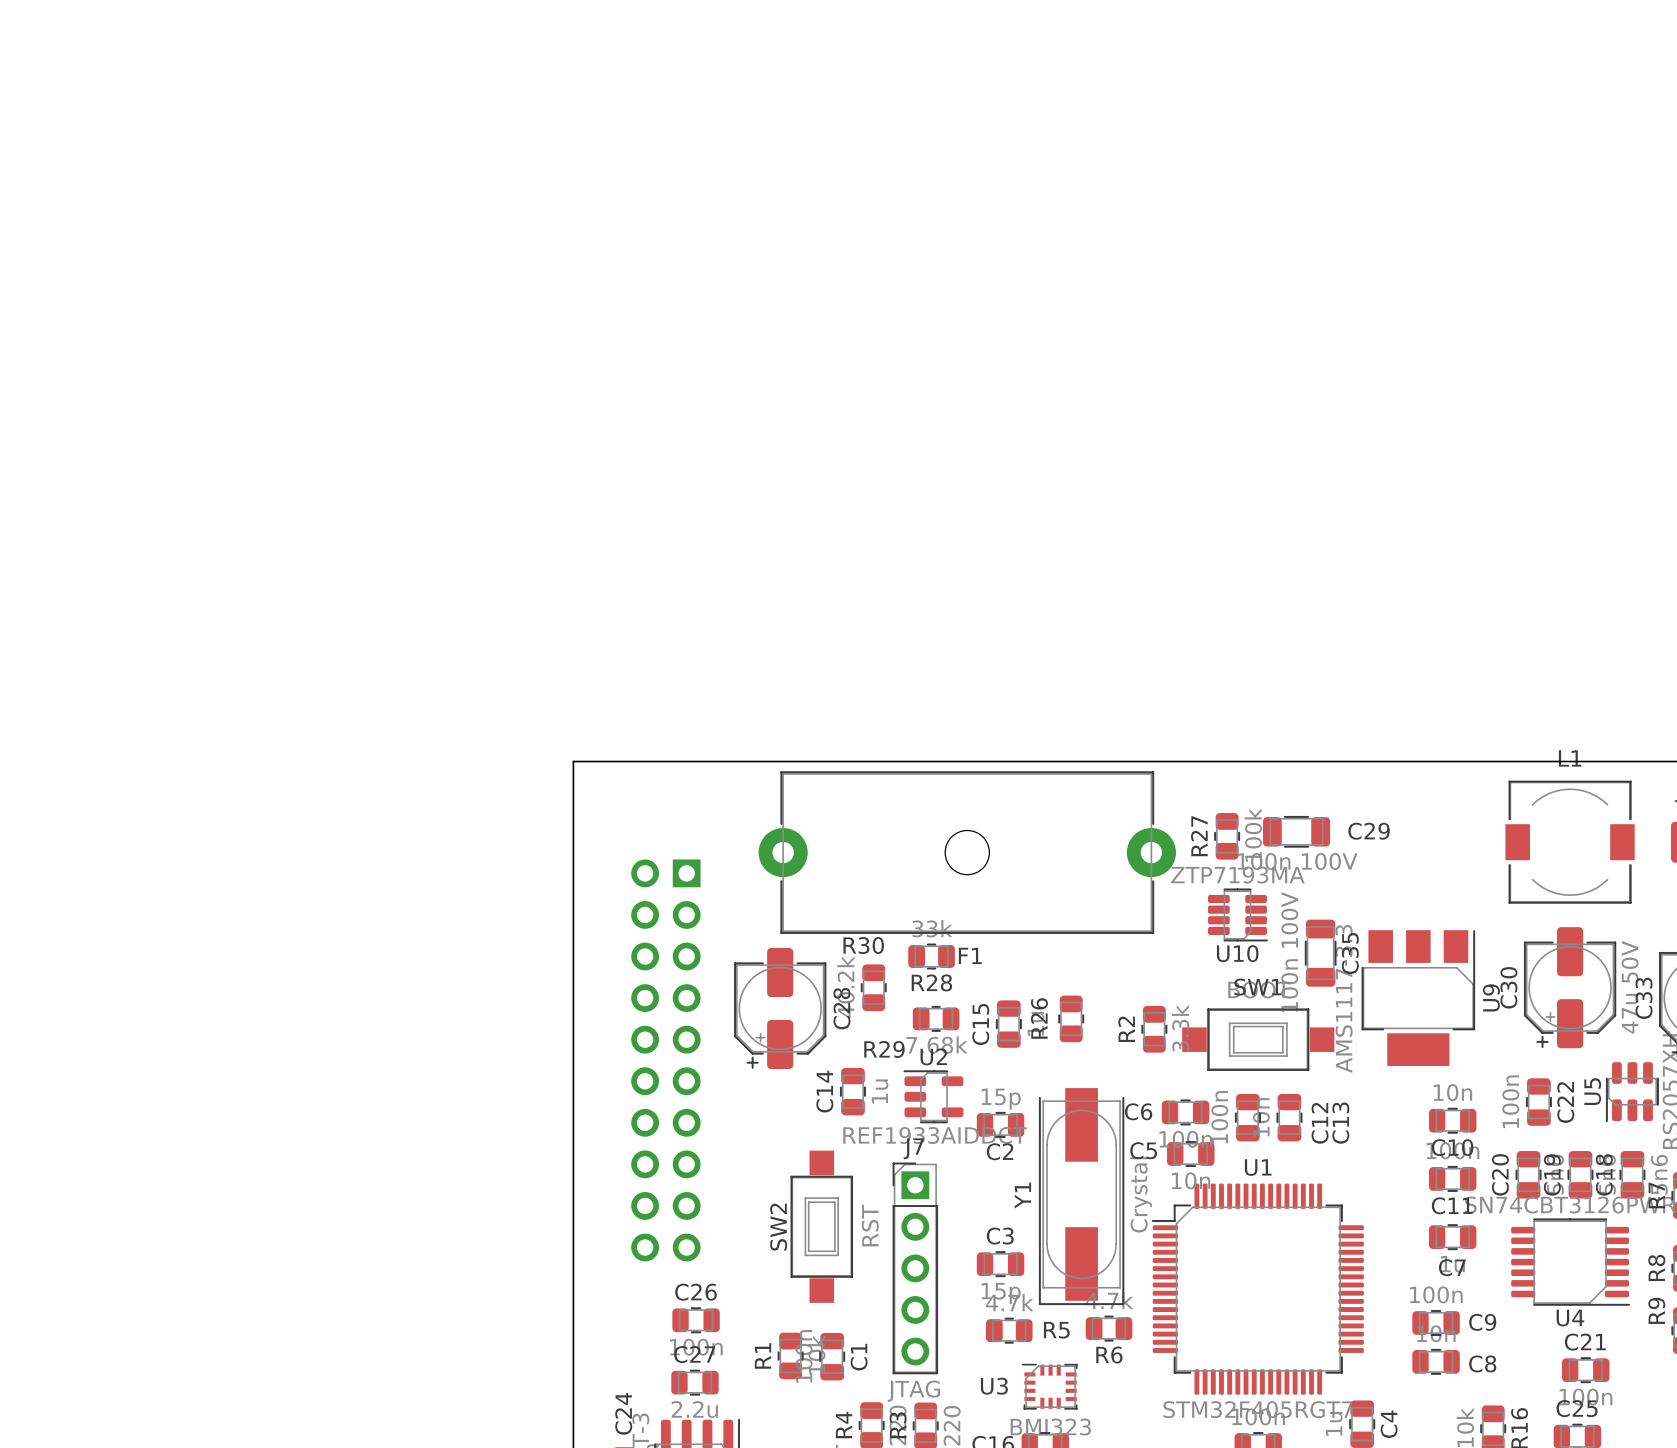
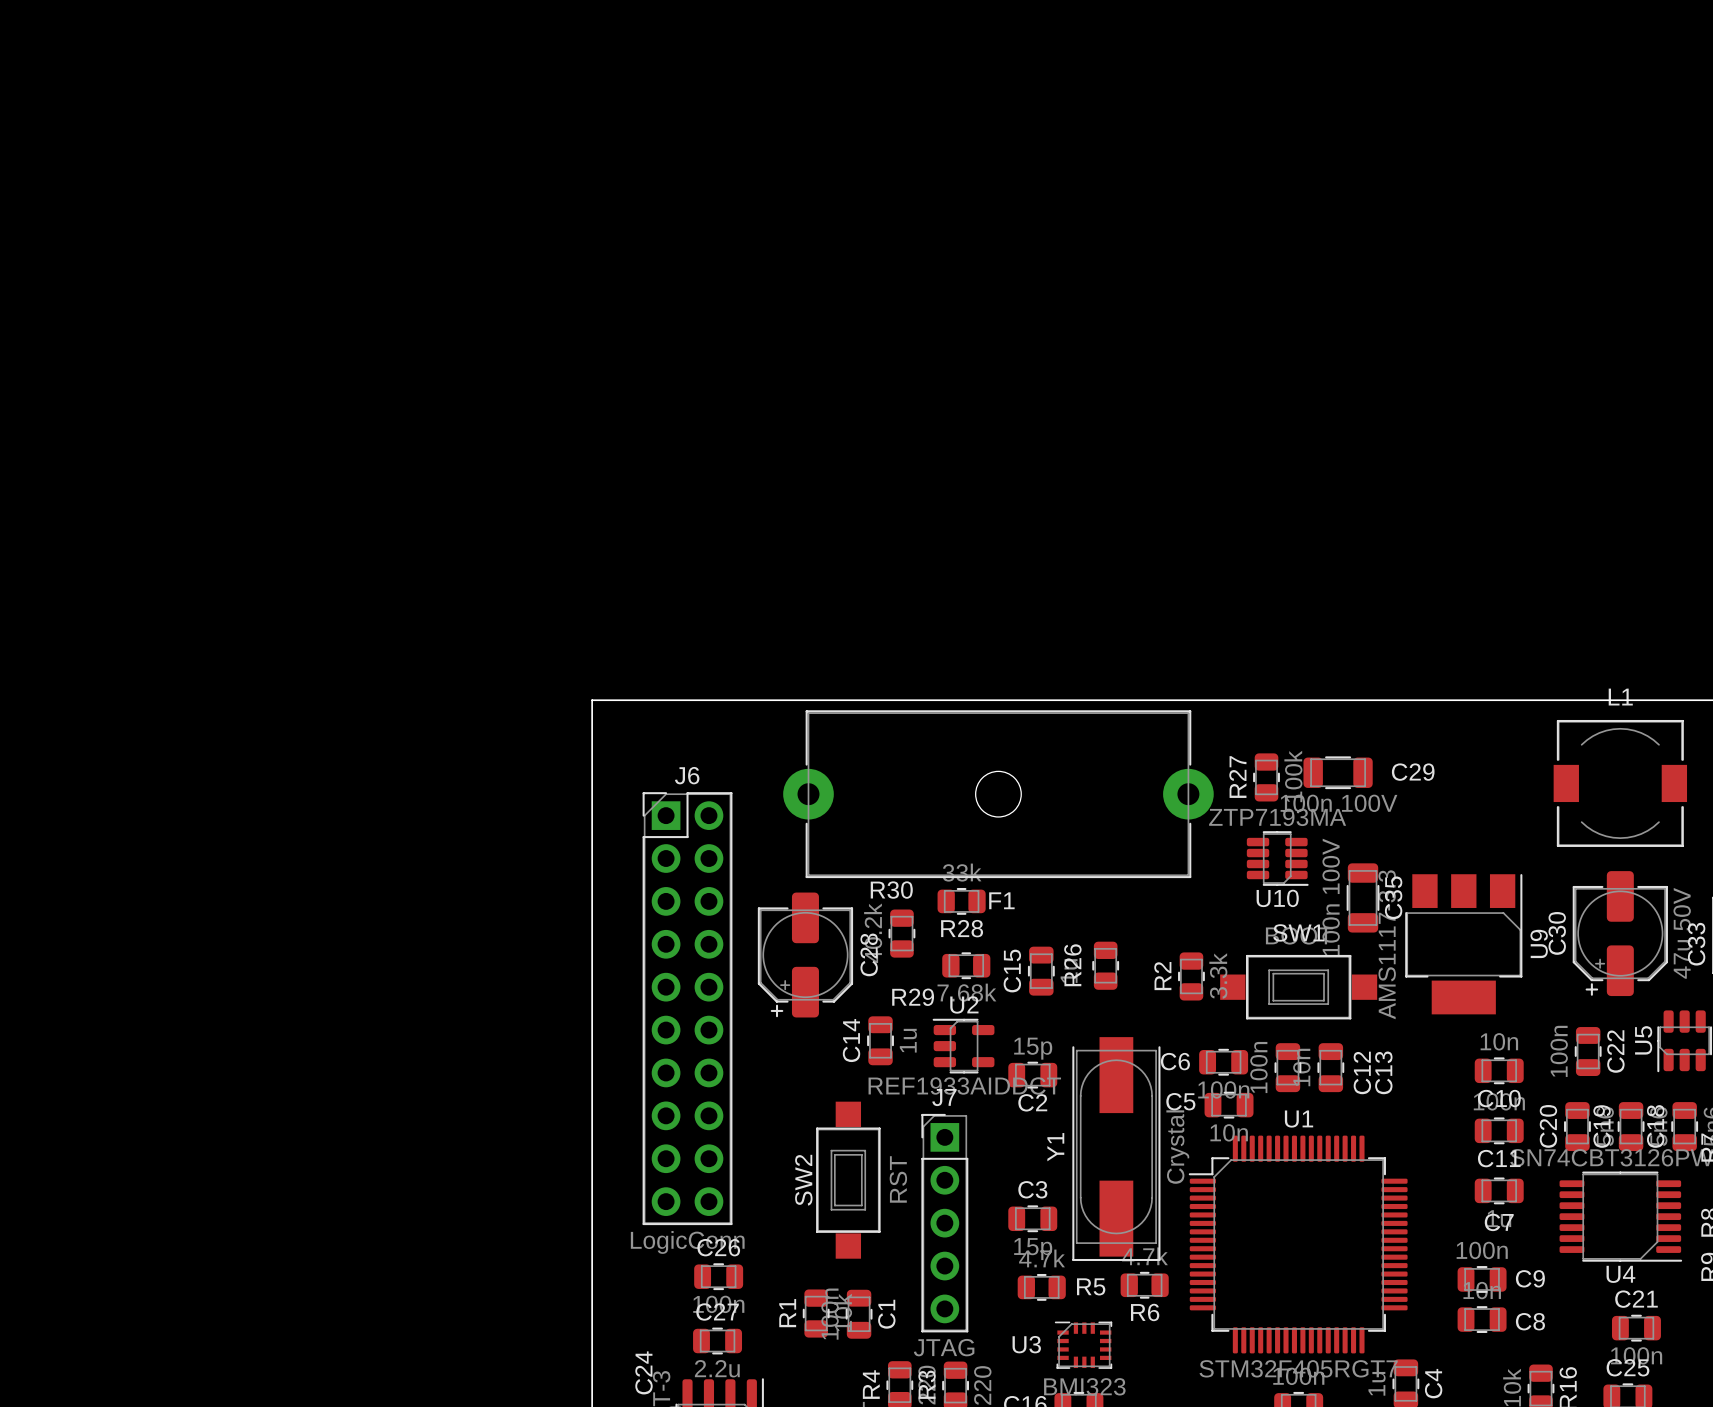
J6 side: bottom (665, 1060) -> top (687, 1008)

